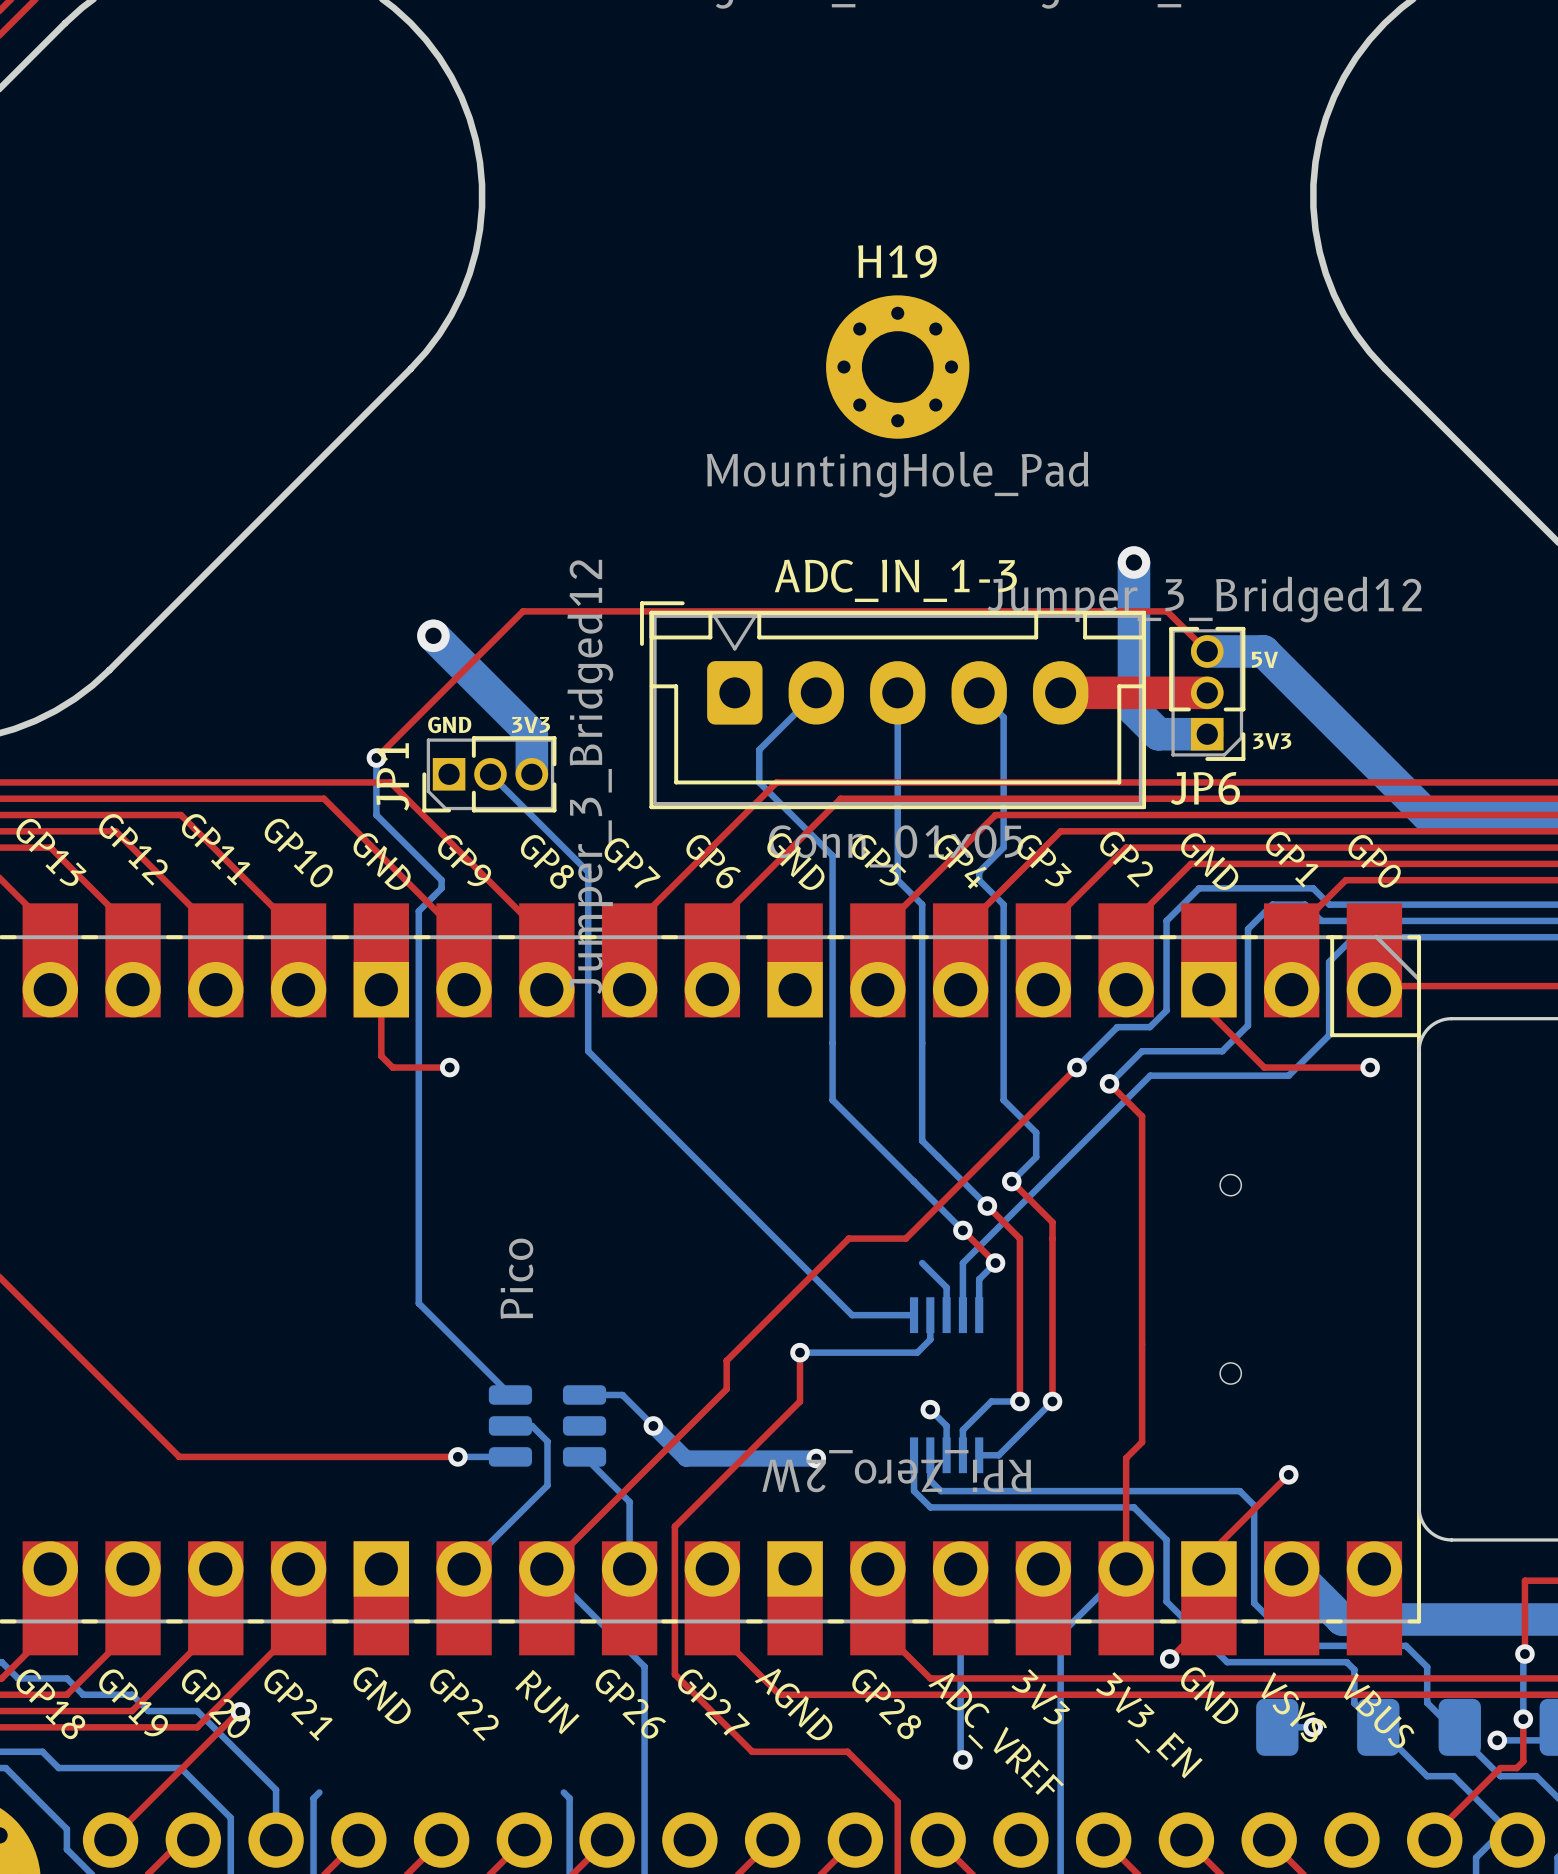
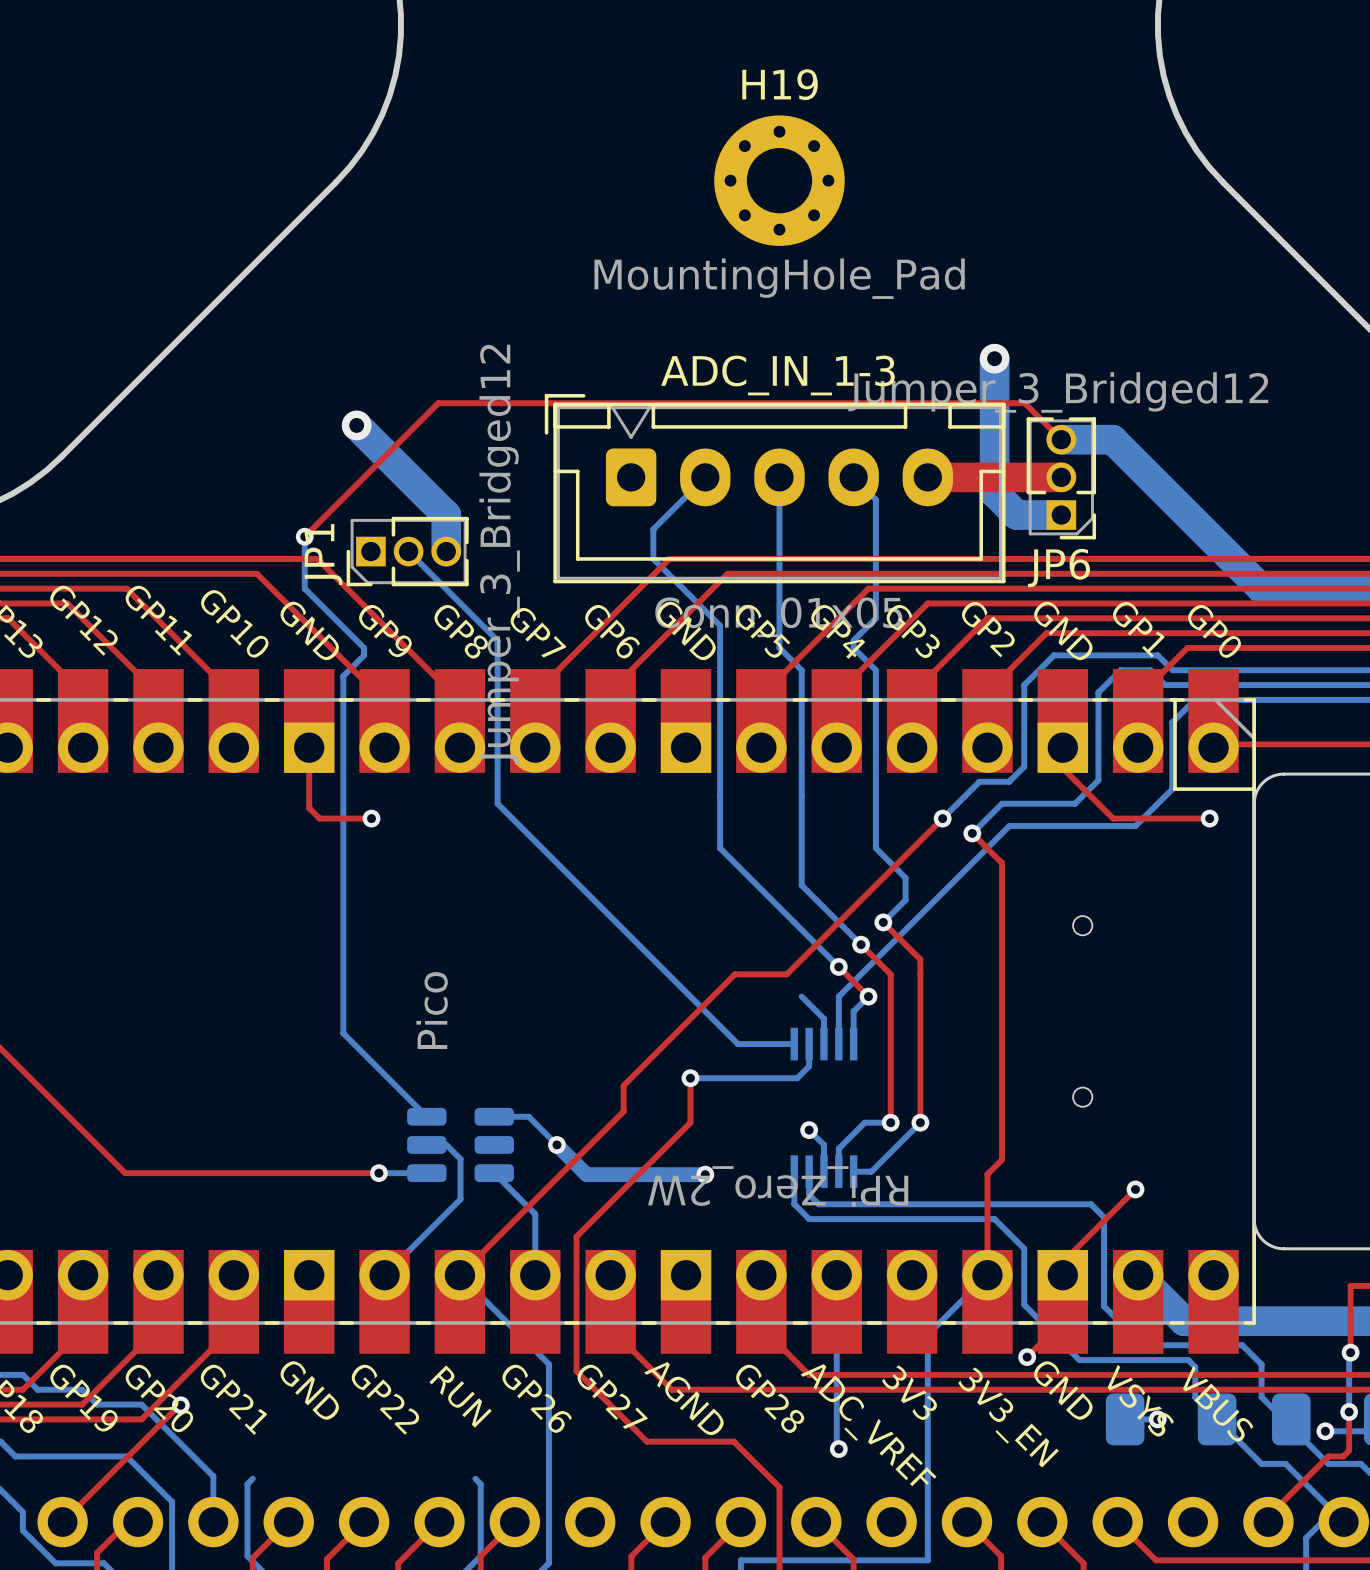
text: 5V (1264, 659) -> none
text: GND (449, 724) -> none
text: 3V3 (531, 724) -> none
text: 3V3 (1272, 741) -> none

